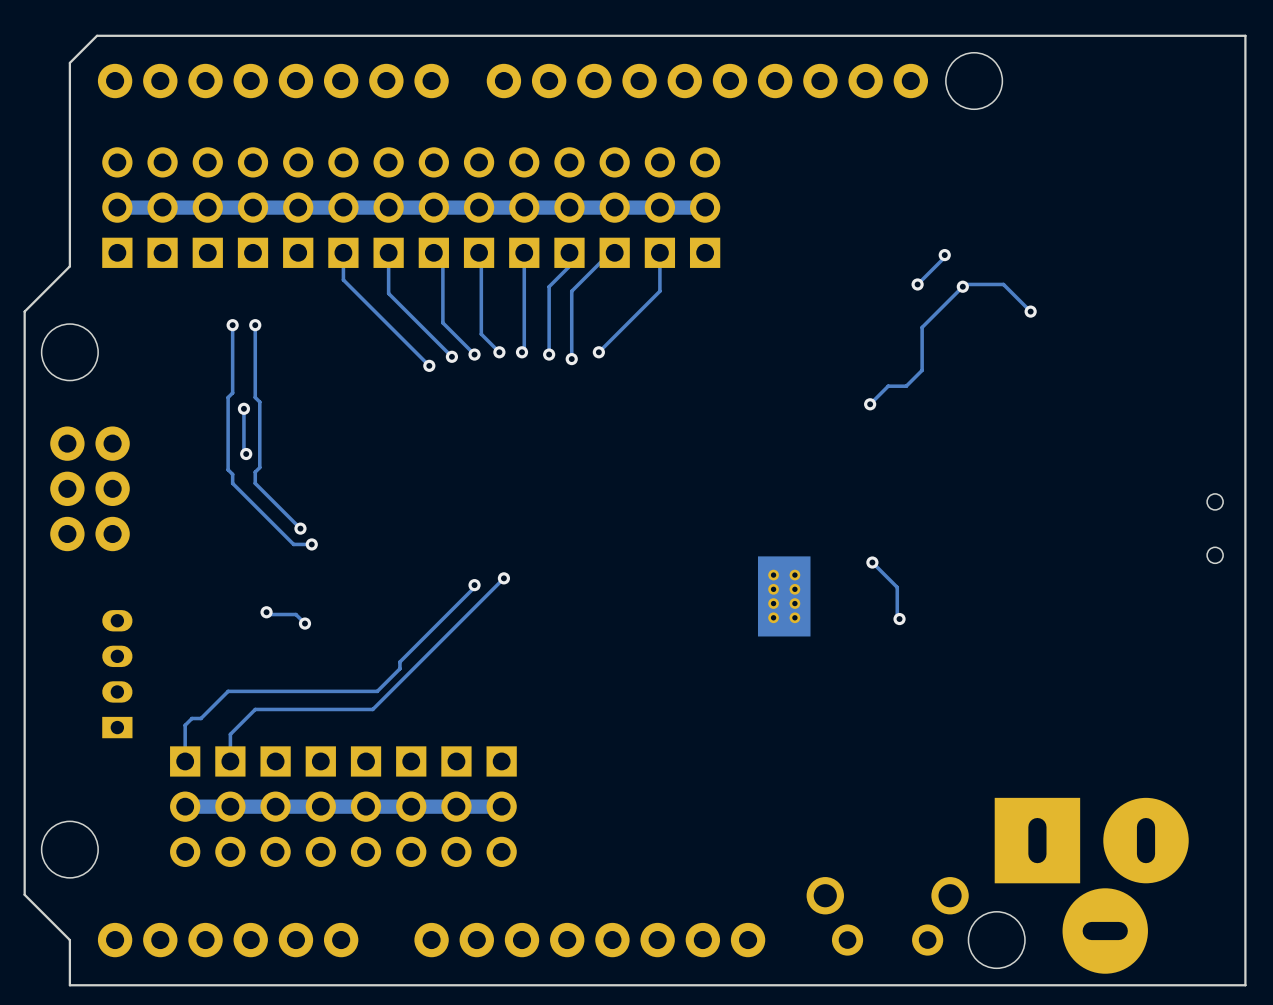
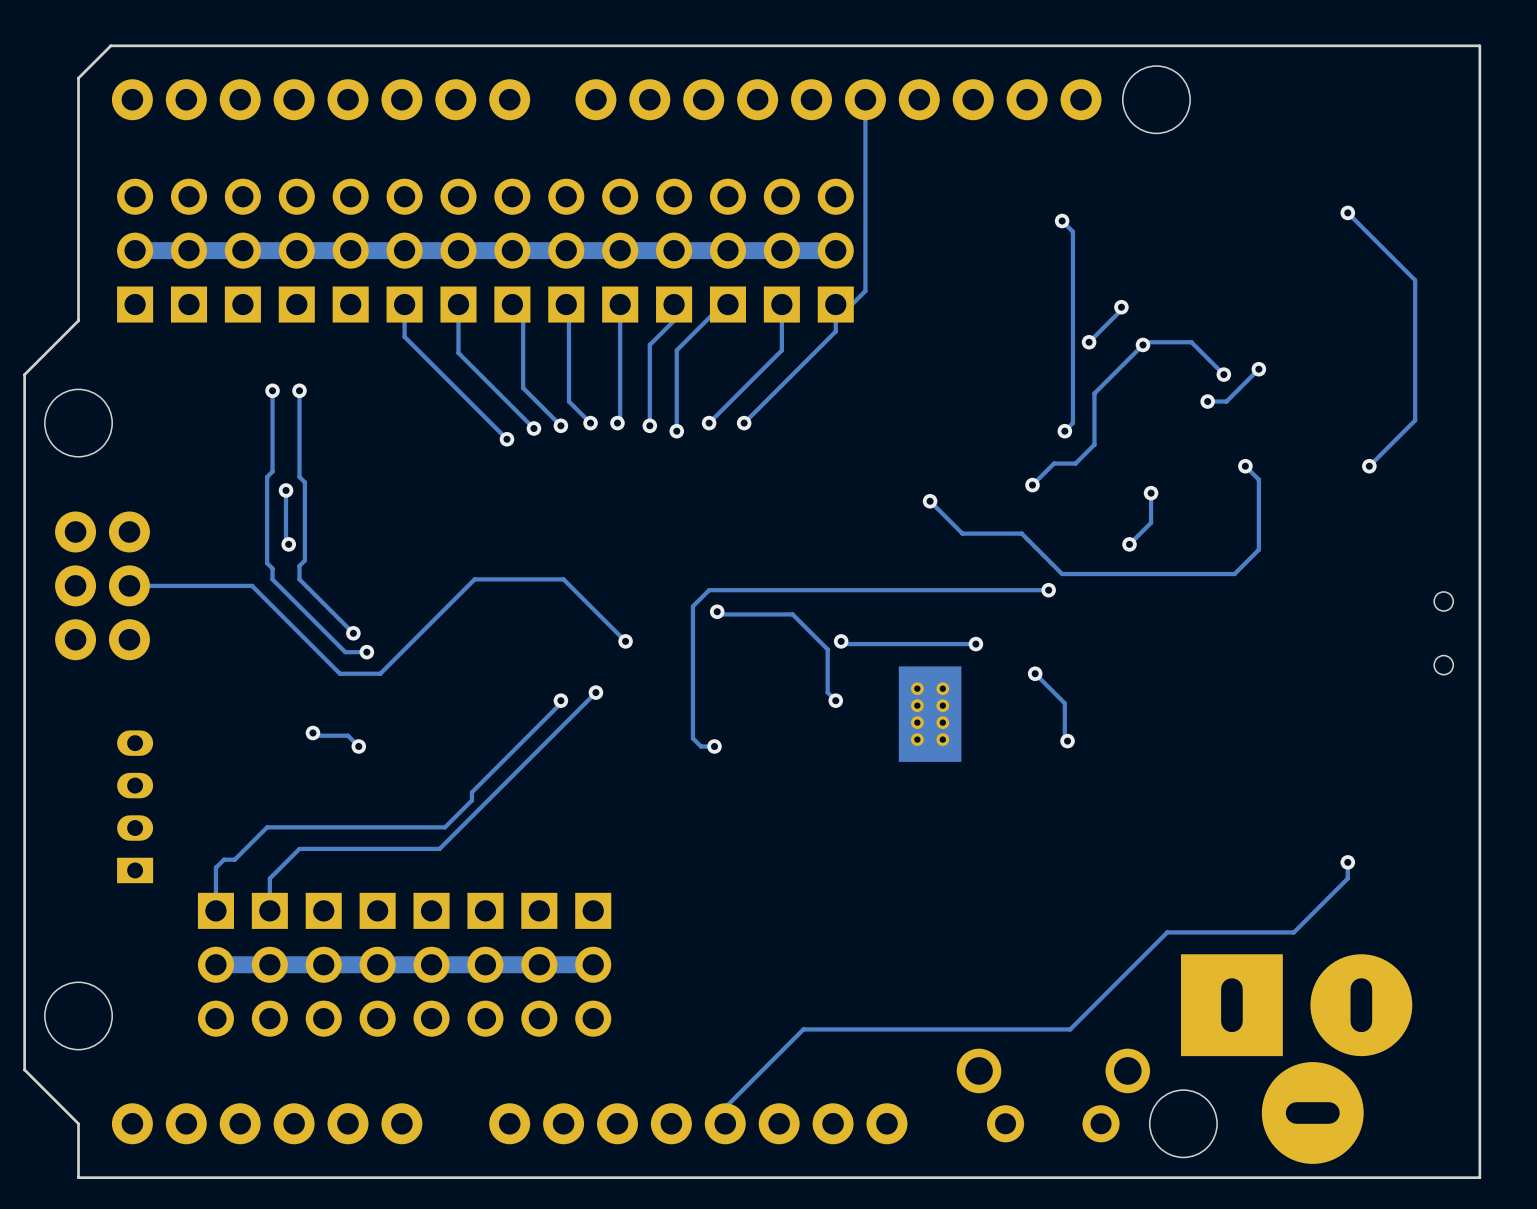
track: none -> (865, 99) (865, 291) (851, 304) (835, 304) (835, 331) (744, 423)
track: none -> (1347, 212) (1415, 280) (1415, 420) (1369, 466)
via: none -> (1347, 212)
track: none -> (1062, 220) (1072, 231) (1072, 423) (1064, 431)
via: none -> (1062, 220)
track: none -> (1258, 369) (1226, 401) (1207, 401)
via: none -> (1258, 369)
via: none -> (1207, 401)
via: none -> (744, 423)
via: none -> (1064, 431)
track: none -> (1245, 466) (1258, 479) (1258, 549) (1234, 574) (1062, 574) (1021, 533) (962, 533) (930, 501)
via: none -> (1245, 466)
via: none -> (1369, 466)
track: none -> (1151, 493) (1151, 522) (1129, 544)
via: none -> (1151, 493)
via: none -> (930, 501)
via: none -> (1129, 544)
track: none -> (129, 585) (252, 585) (339, 673) (380, 673) (474, 579) (563, 579) (625, 641)
track: none -> (1048, 590) (709, 590) (692, 606) (692, 738) (701, 746) (714, 746)
via: none -> (1048, 590)
track: none -> (717, 611) (719, 614) (792, 614) (827, 649) (827, 692) (835, 700)
via: none -> (717, 611)
via: none -> (625, 641)
track: none -> (841, 641) (843, 644) (975, 644)
via: none -> (841, 641)
via: none -> (975, 644)
via: none -> (835, 700)
via: none -> (714, 746)
track: none -> (1347, 862) (1347, 878) (1293, 932) (1167, 932) (1070, 1029) (803, 1029) (725, 1107) (725, 1123)
via: none -> (1347, 862)

